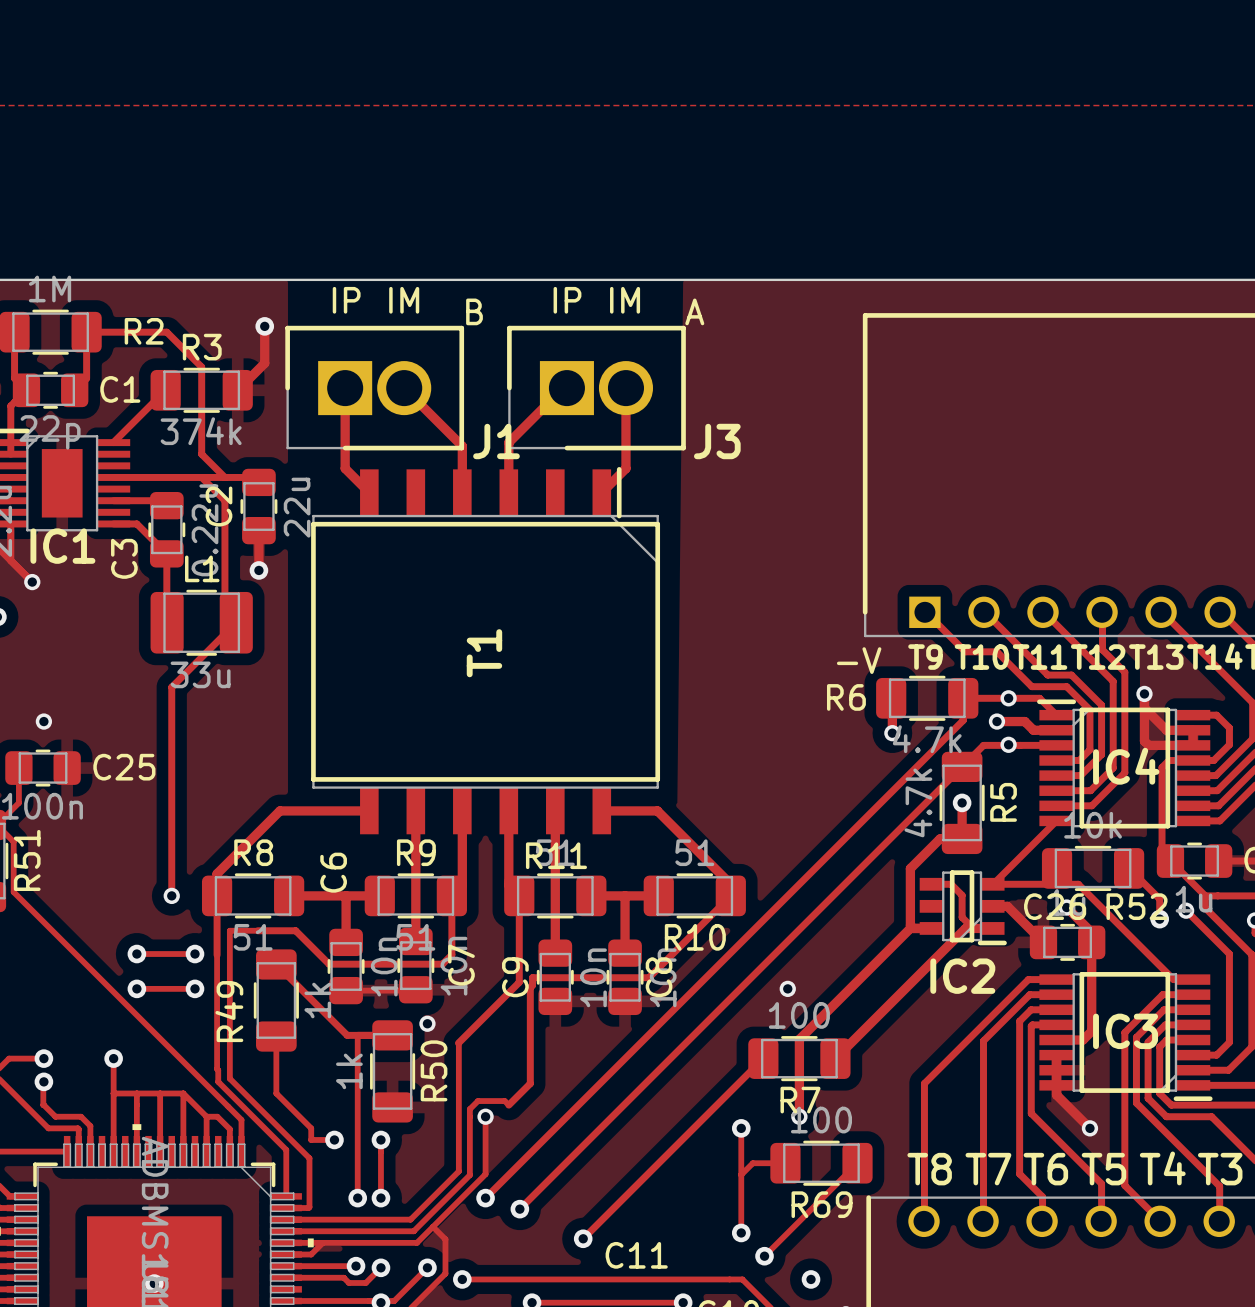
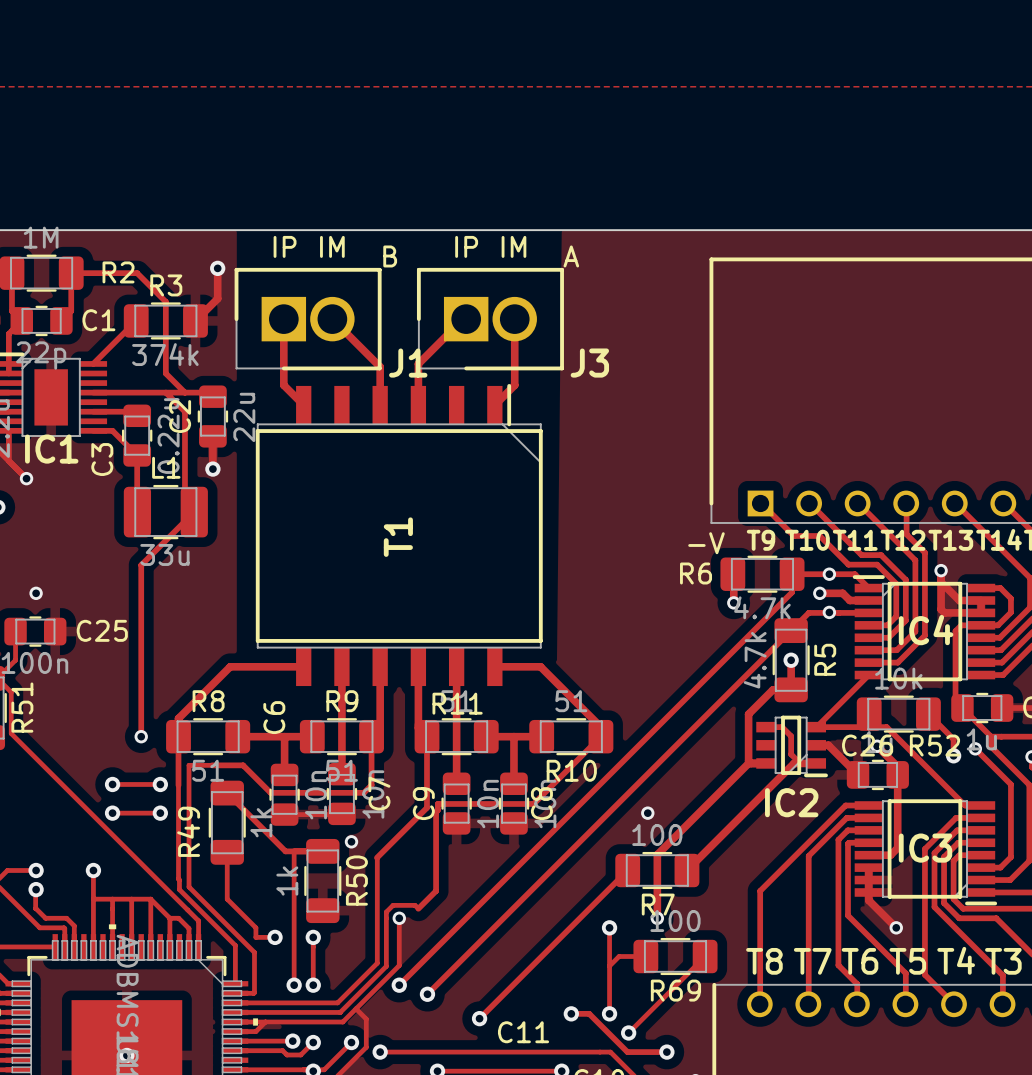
track: none -> (571, 1013) (589, 1013) (627, 1052) (666, 1052)
via: none -> (571, 1013)

